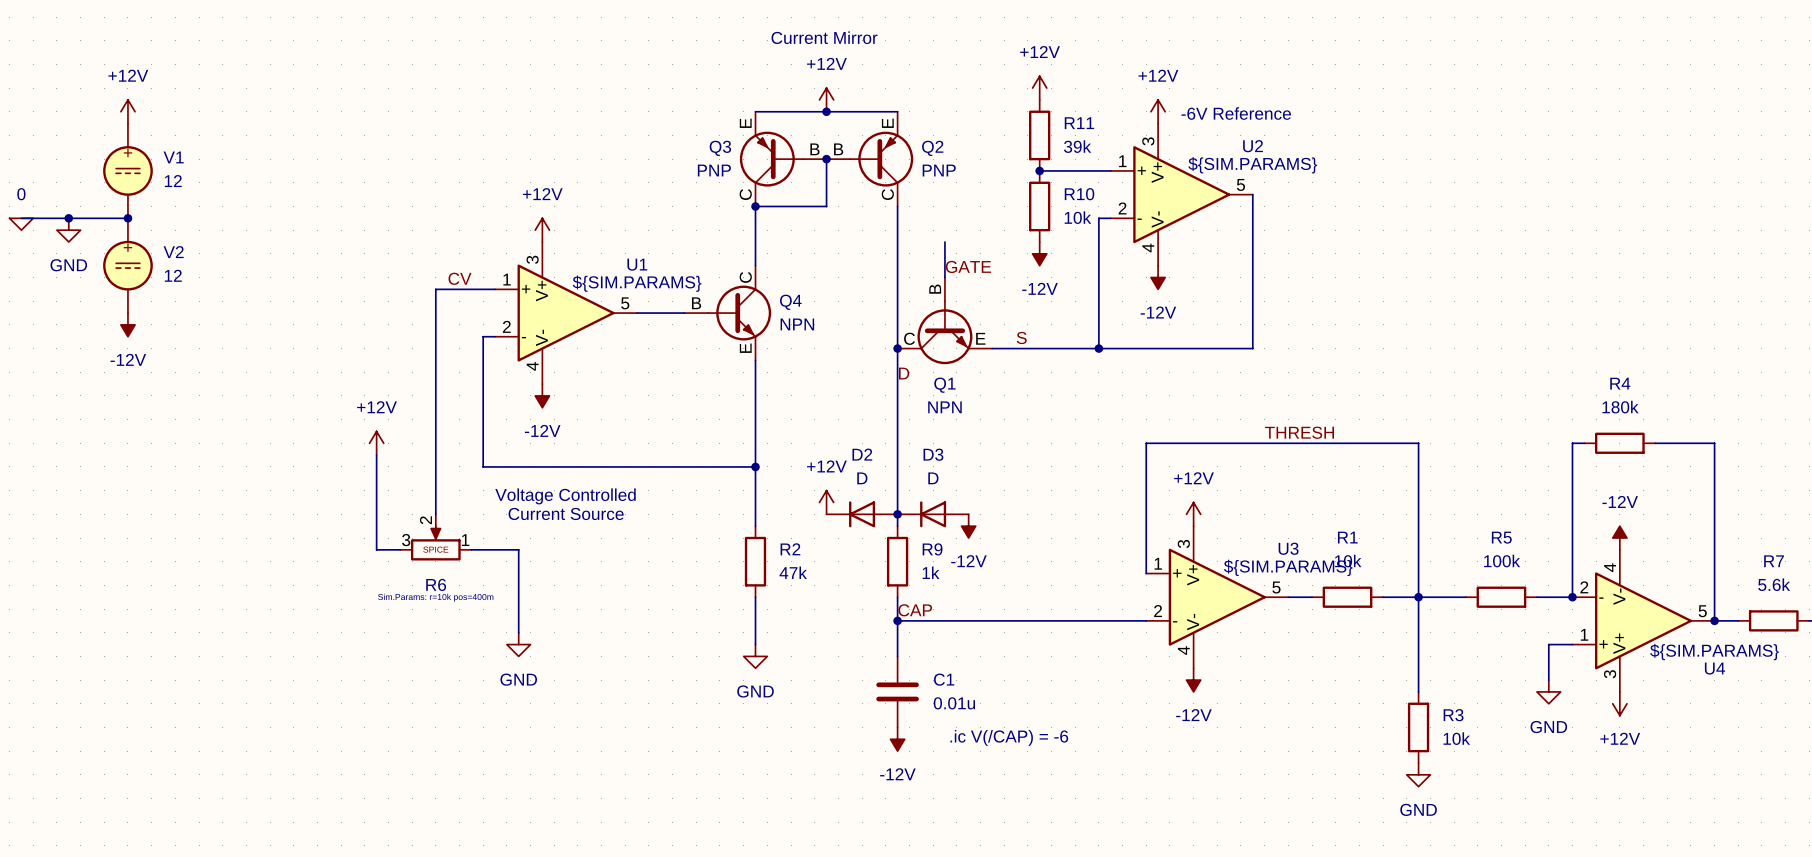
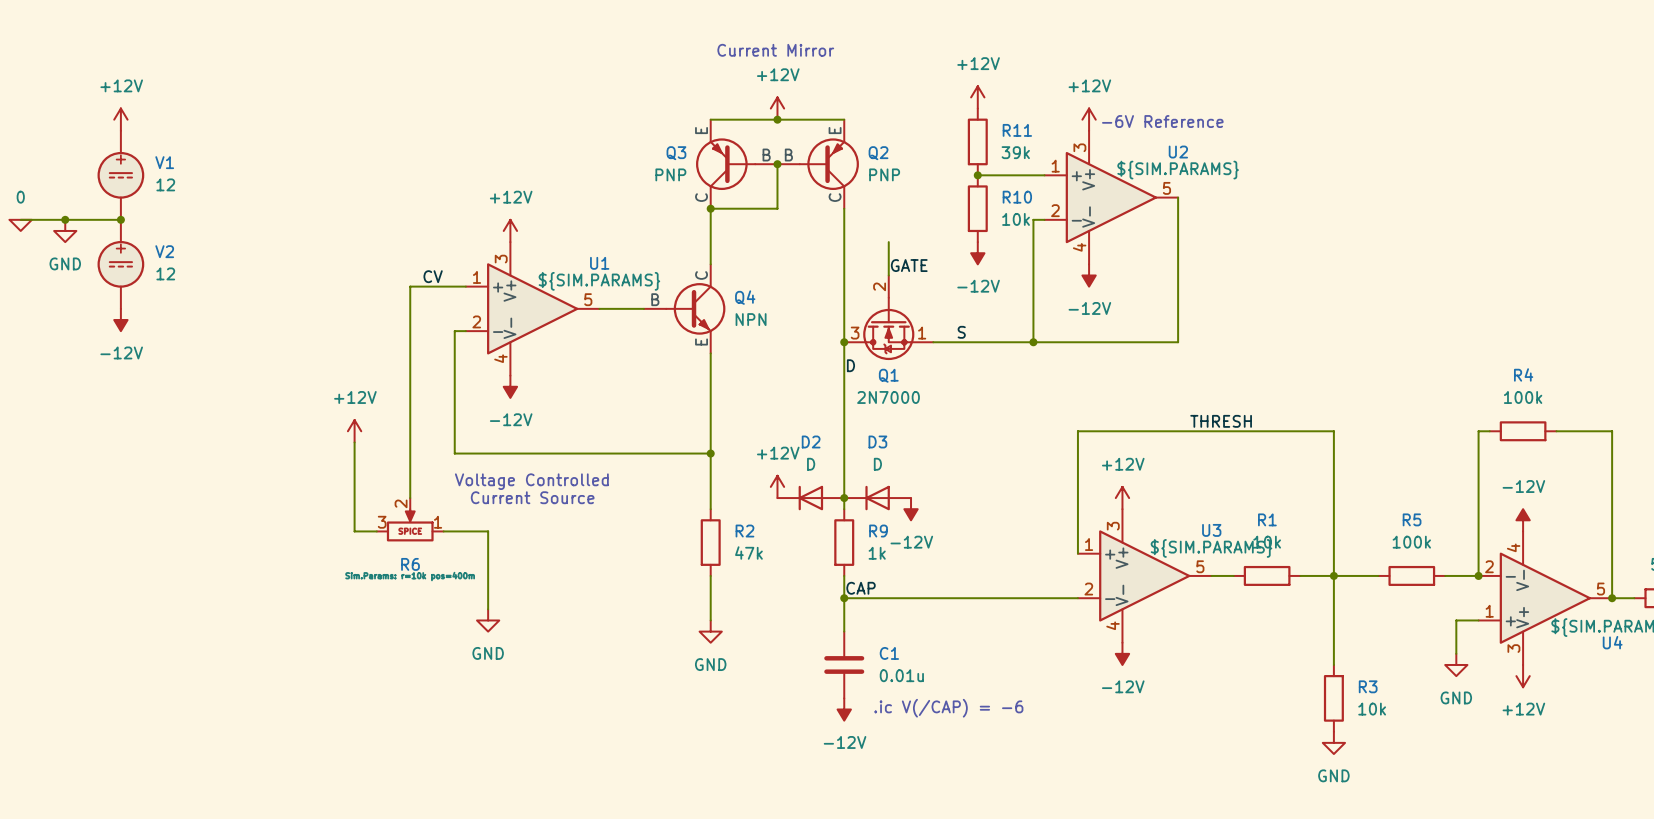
Q1 symbol: [897, 277, 993, 365] -> [844, 275, 934, 361]
Q1 value: NPN (944, 407) -> 2N7000 (888, 397)
R4 value: 180k (1620, 407) -> 100k (1523, 397)

